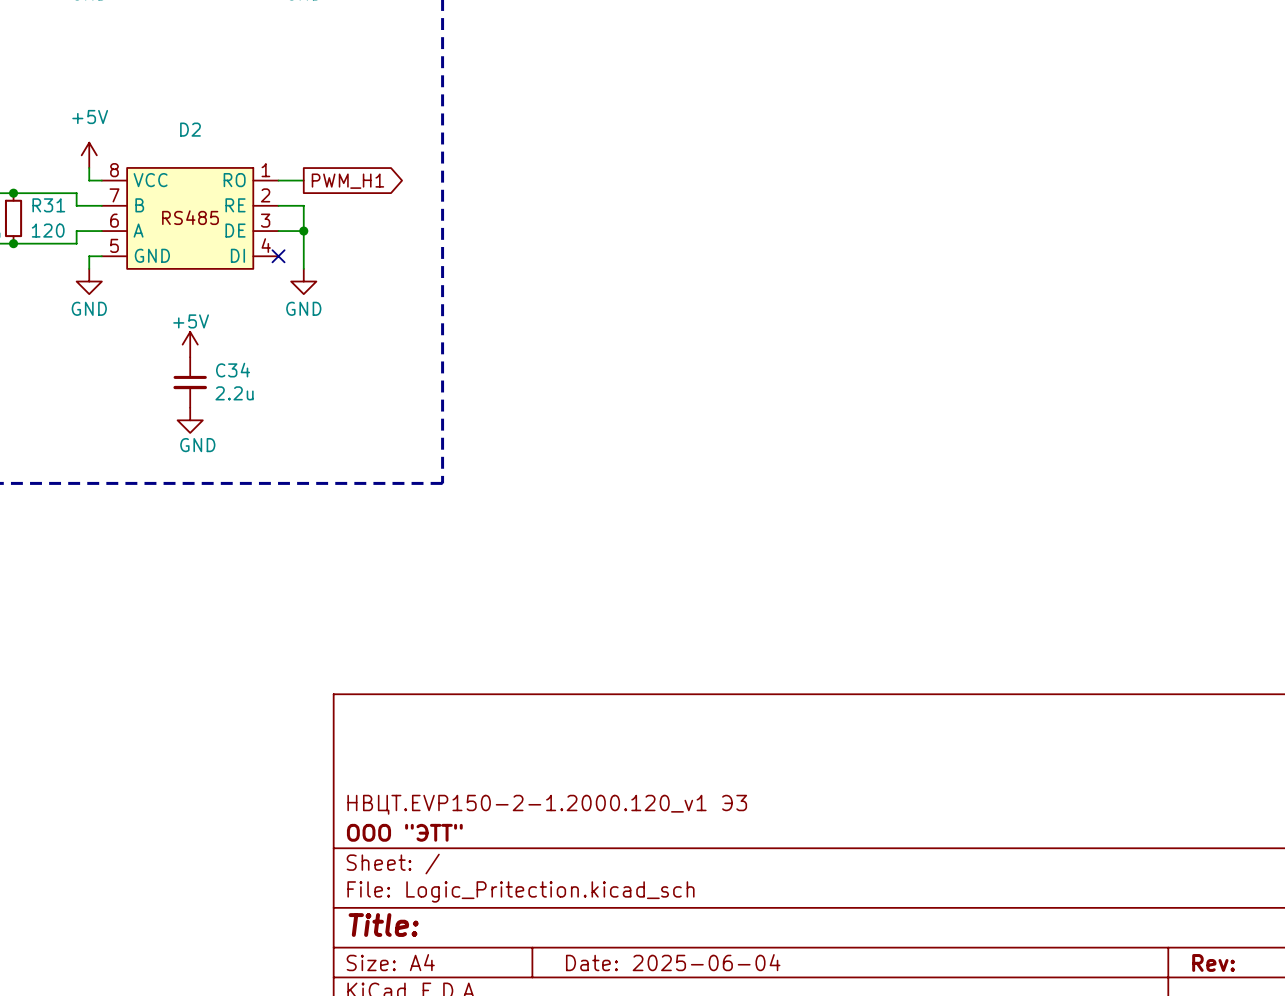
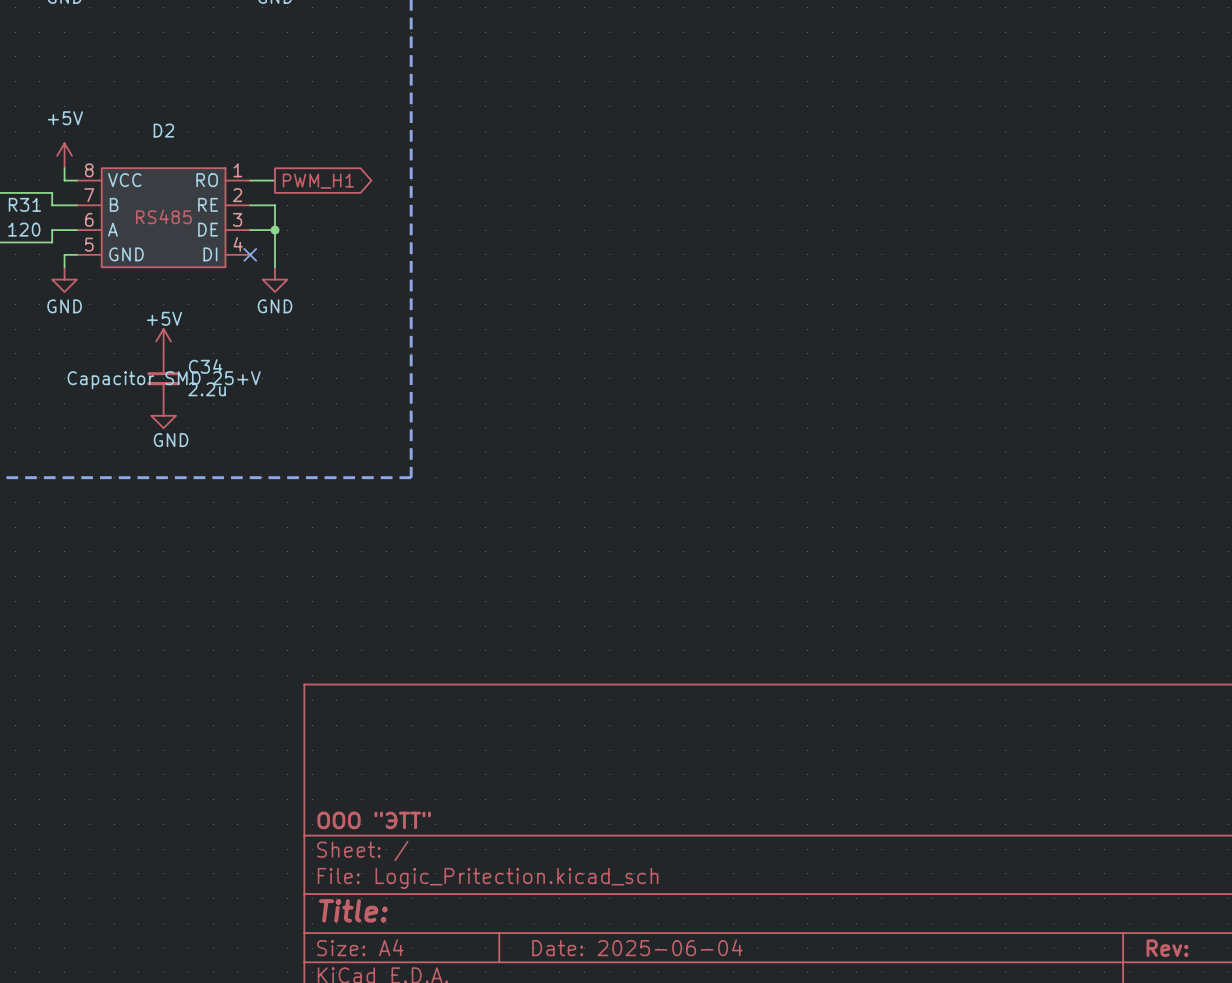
C34 text: none -> Capacitor SMD 25+V (164, 380)
title block: НВЦТ.EVP150-2-1.2000.120_v1 Э3 (547, 804) -> none

